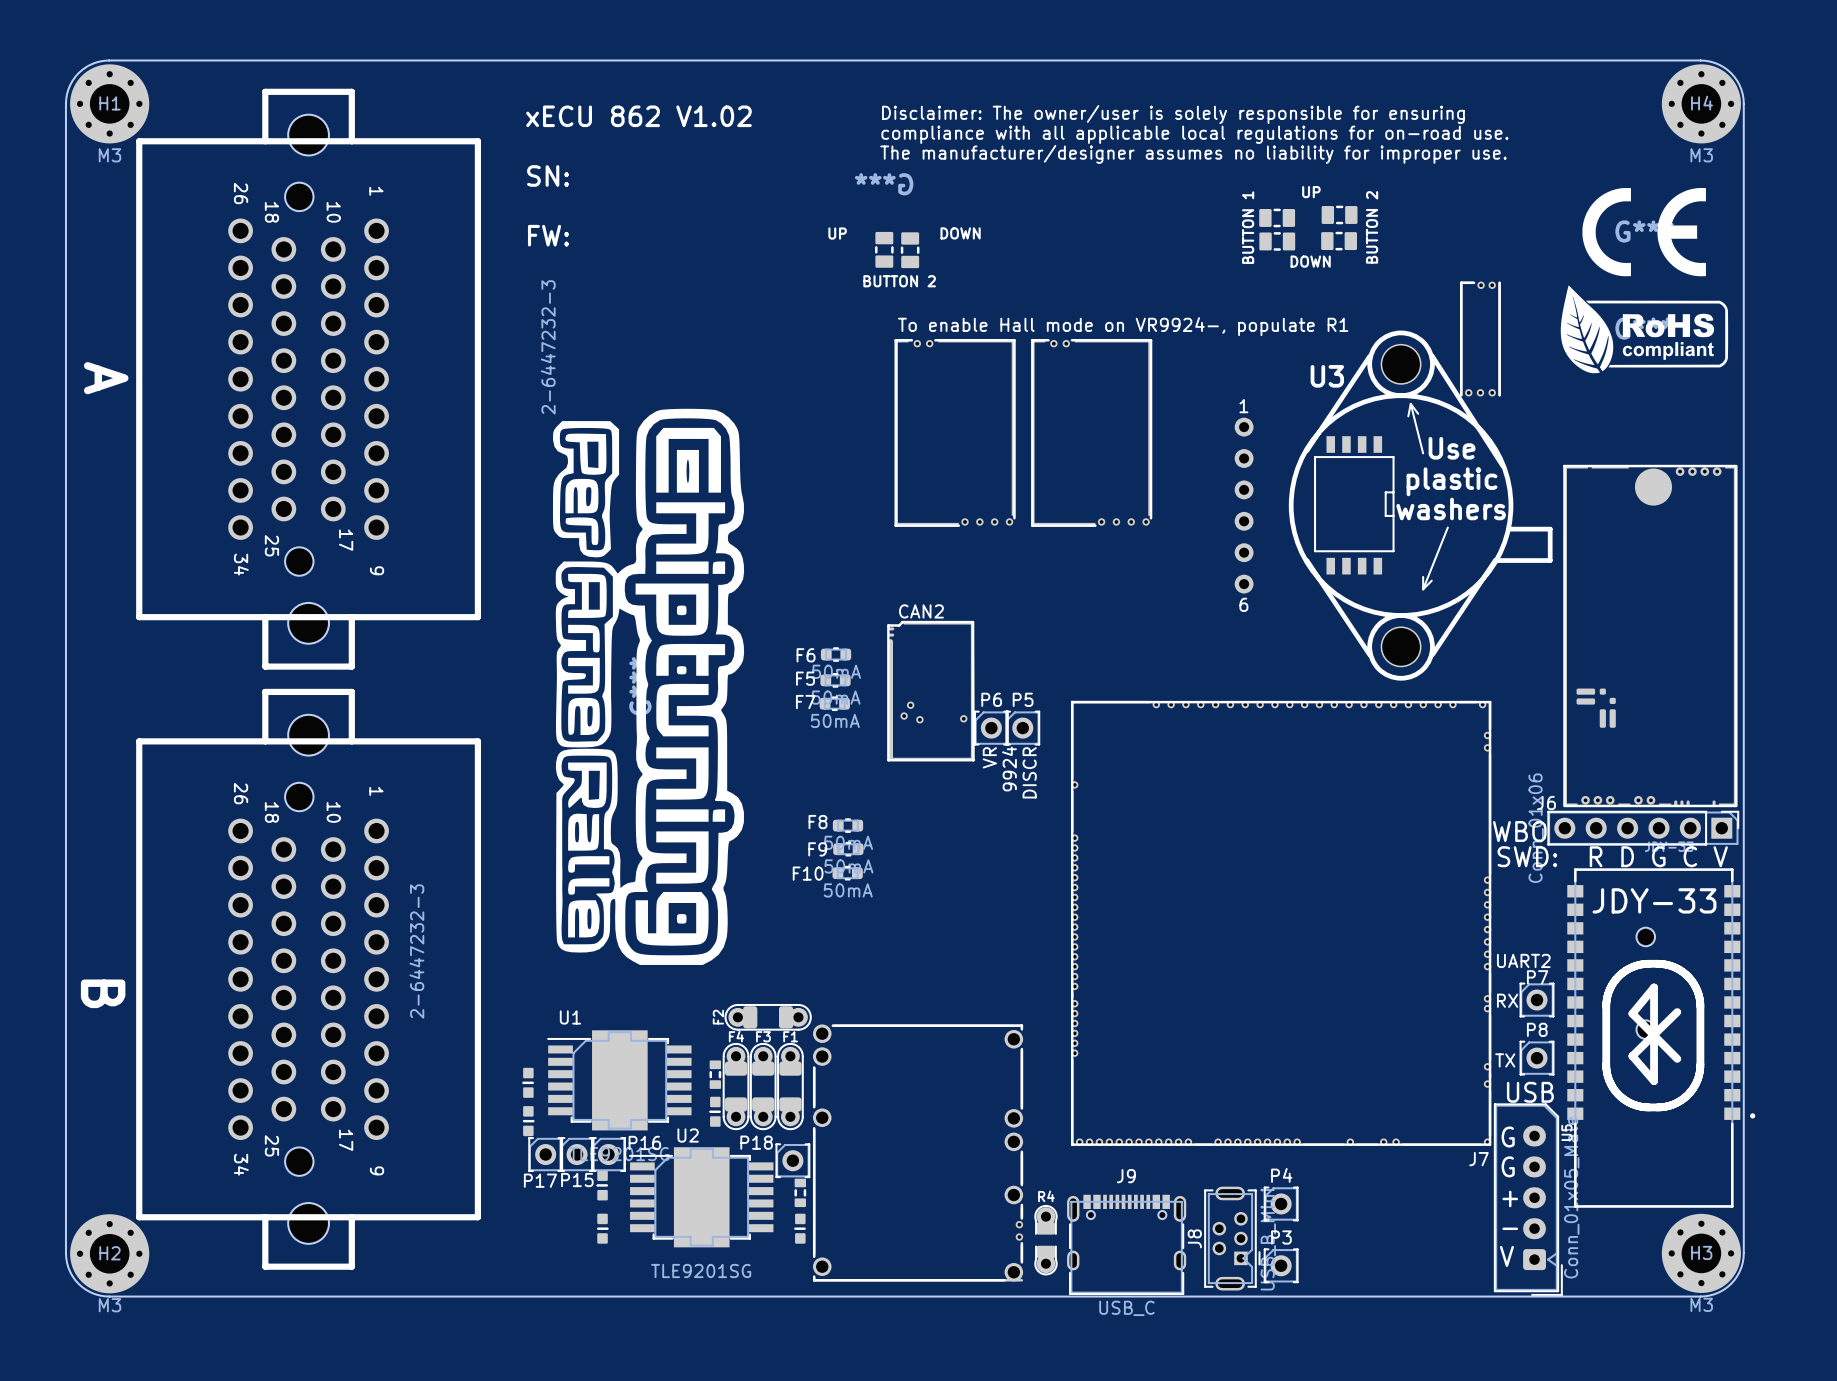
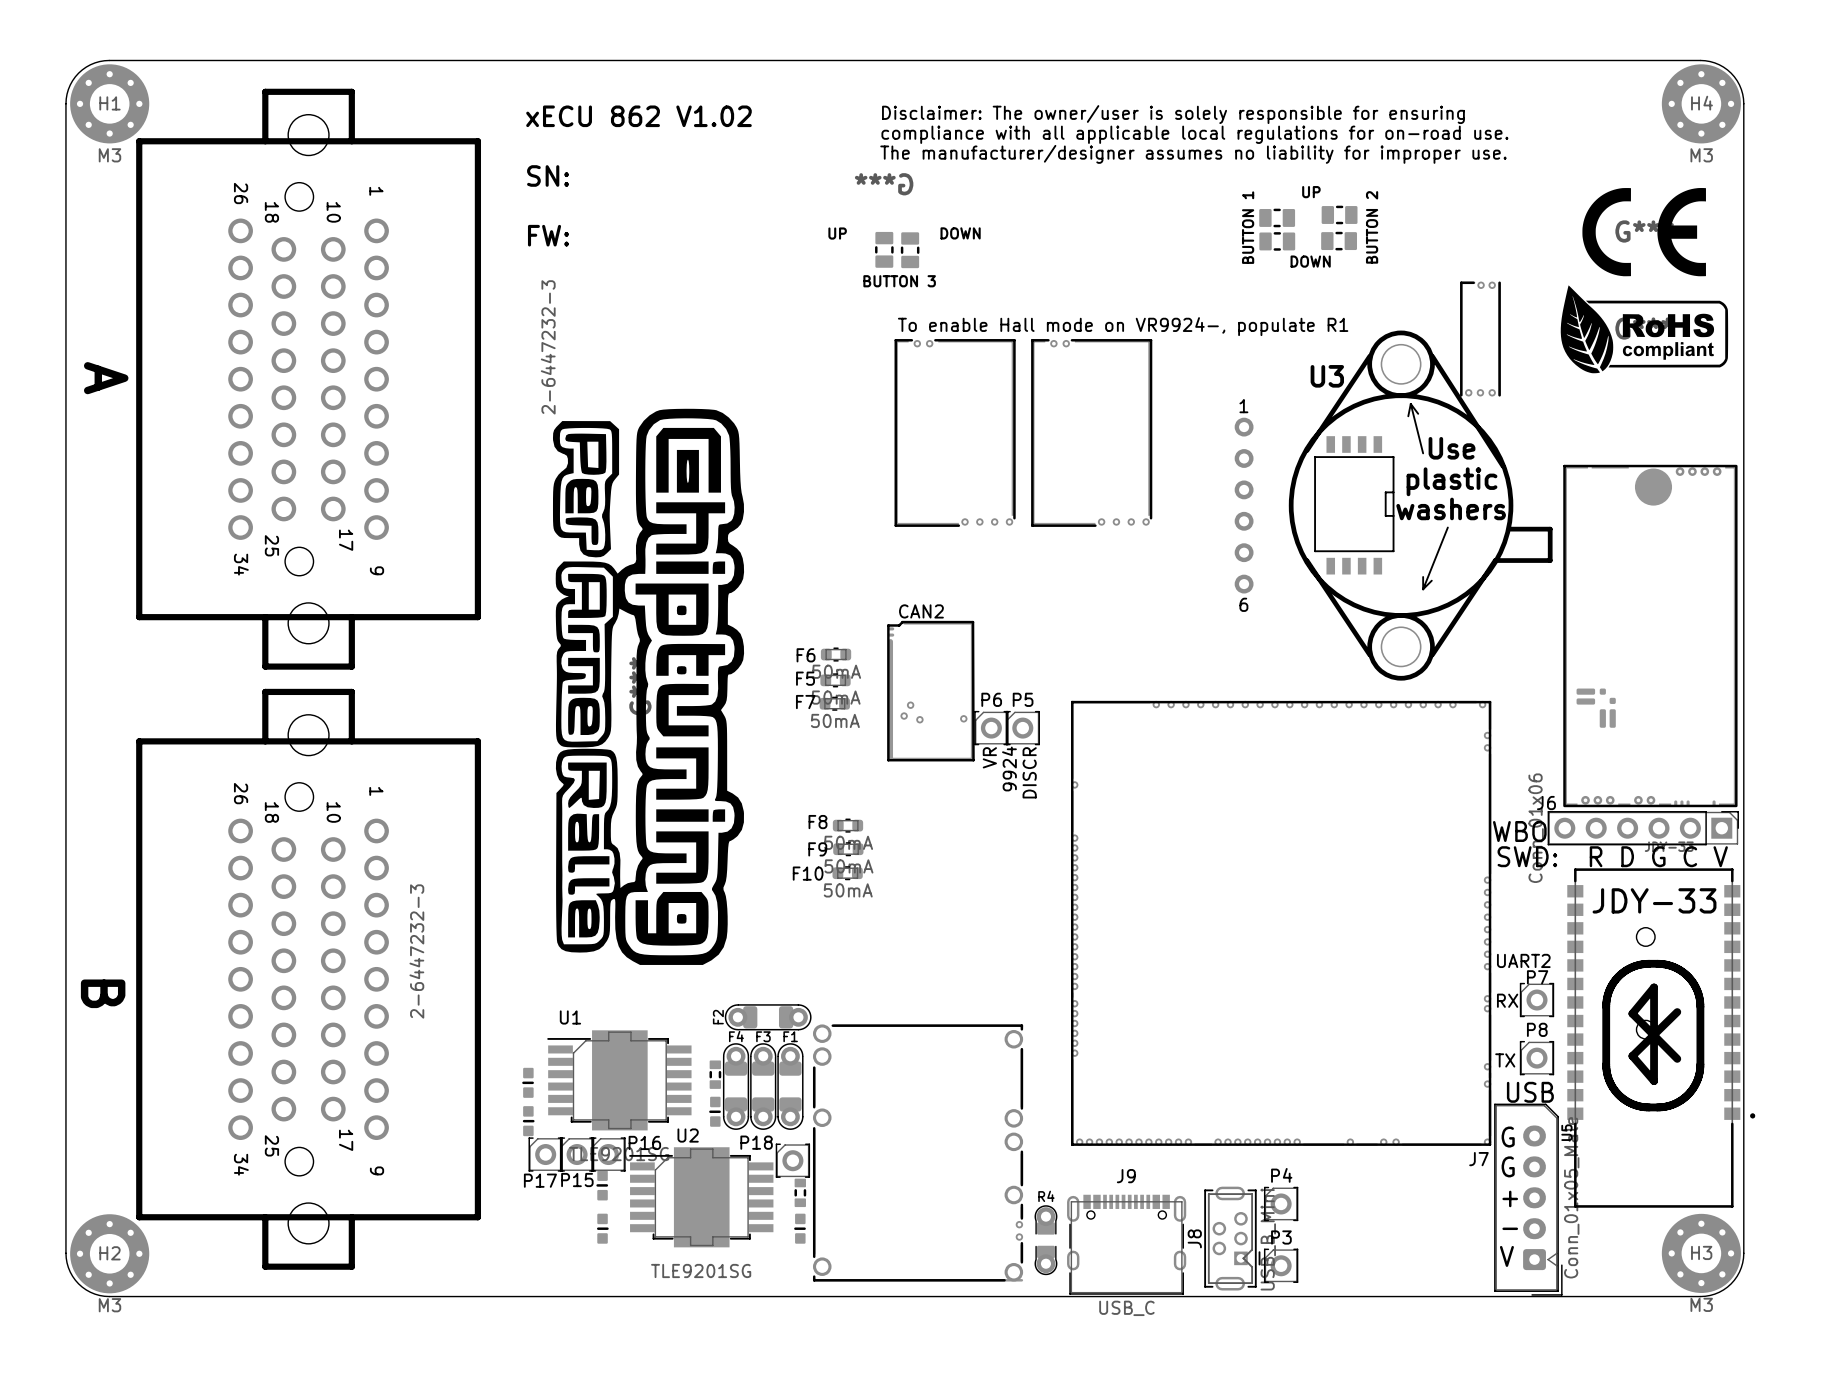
text: BUTTON 2 (899, 281) -> BUTTON 3 (899, 281)

